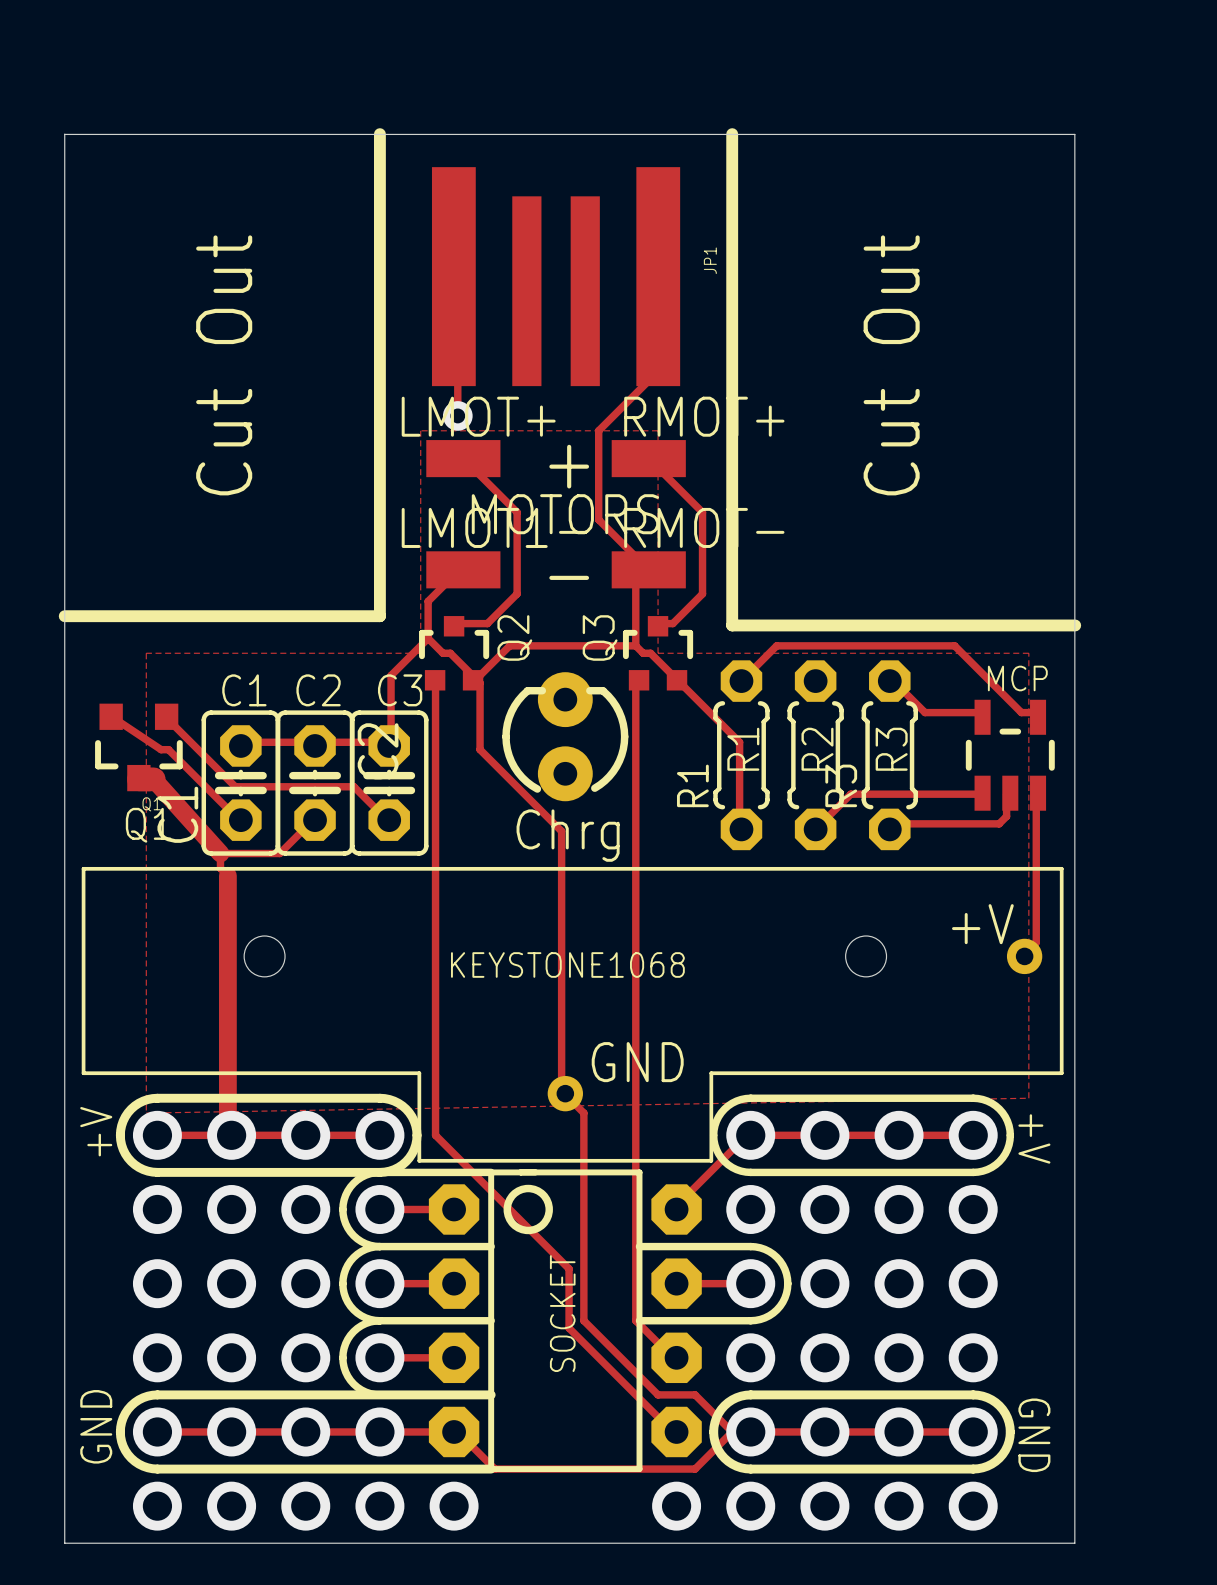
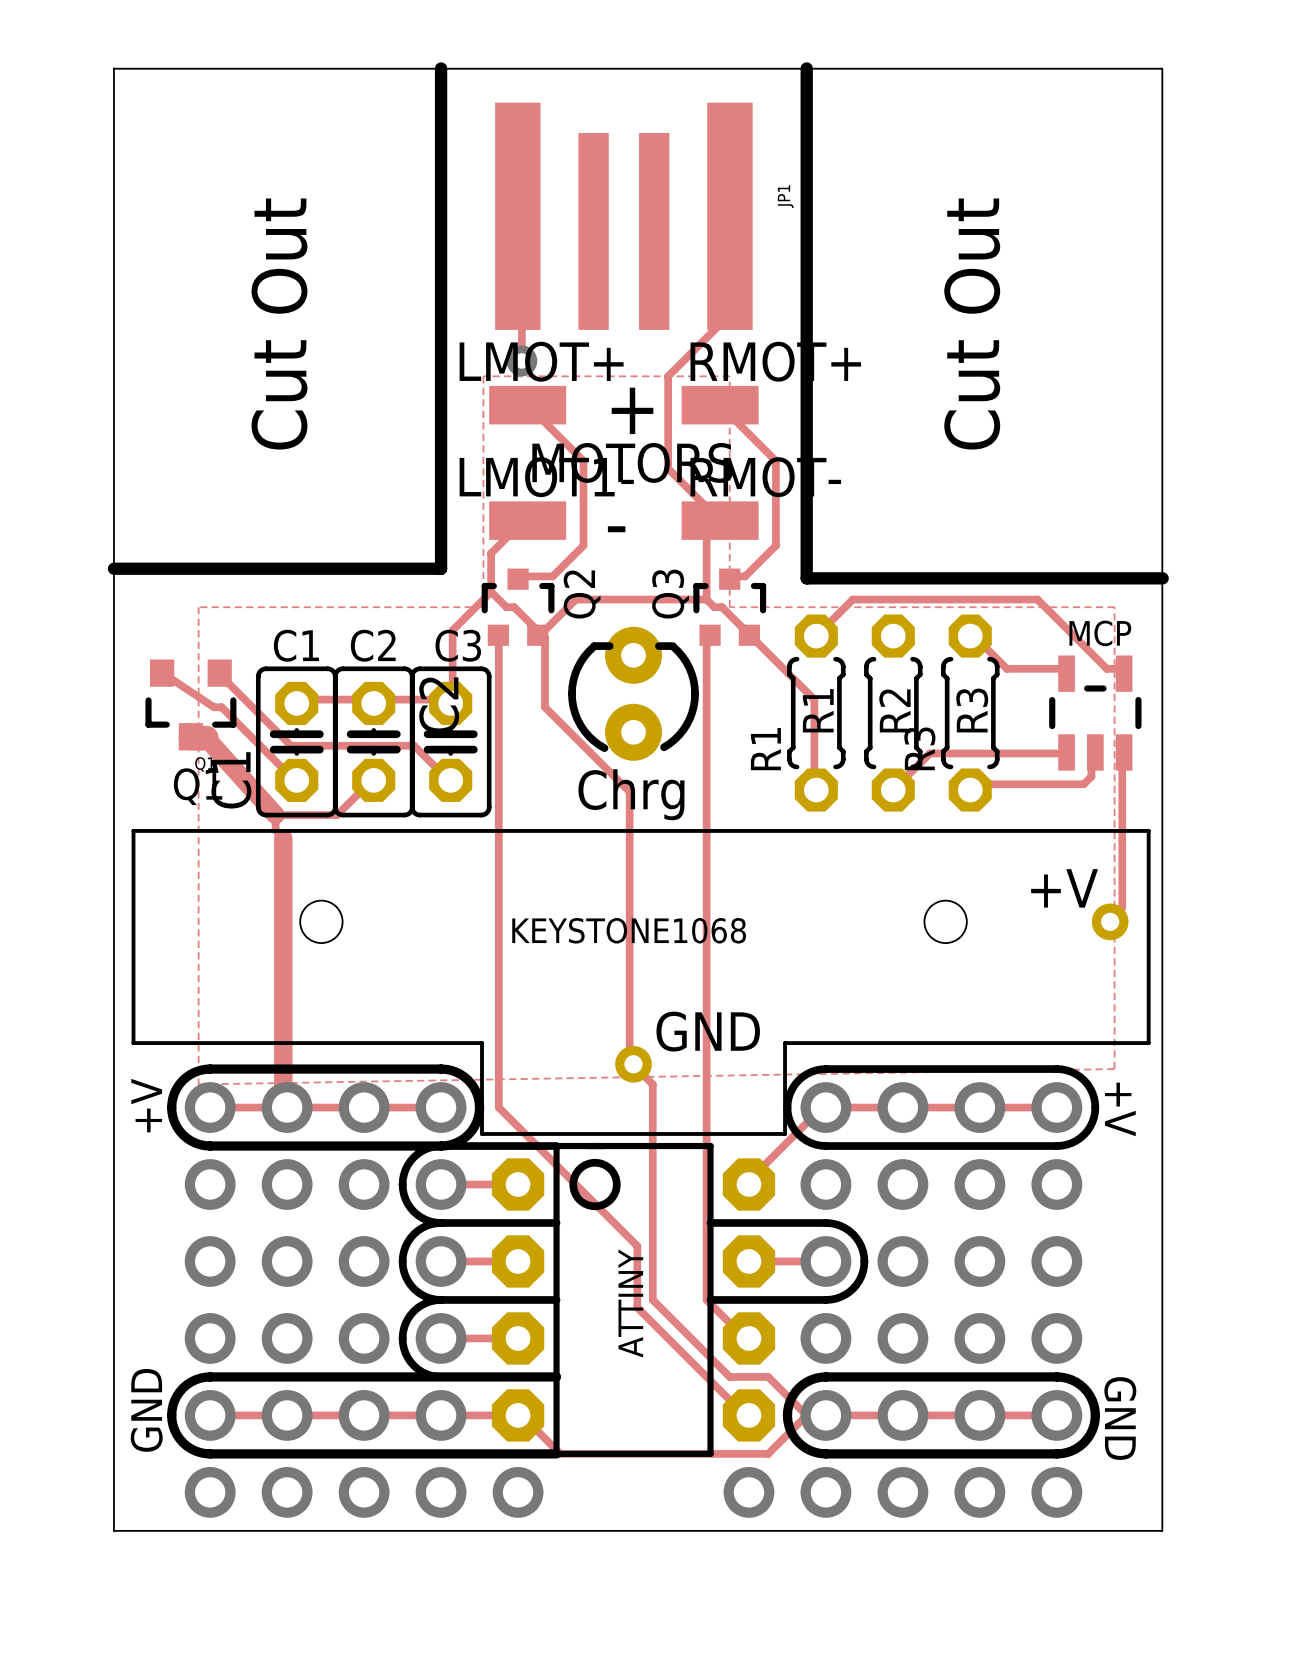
text: SOCKET (562, 1313) -> ATTINY (630, 1303)

